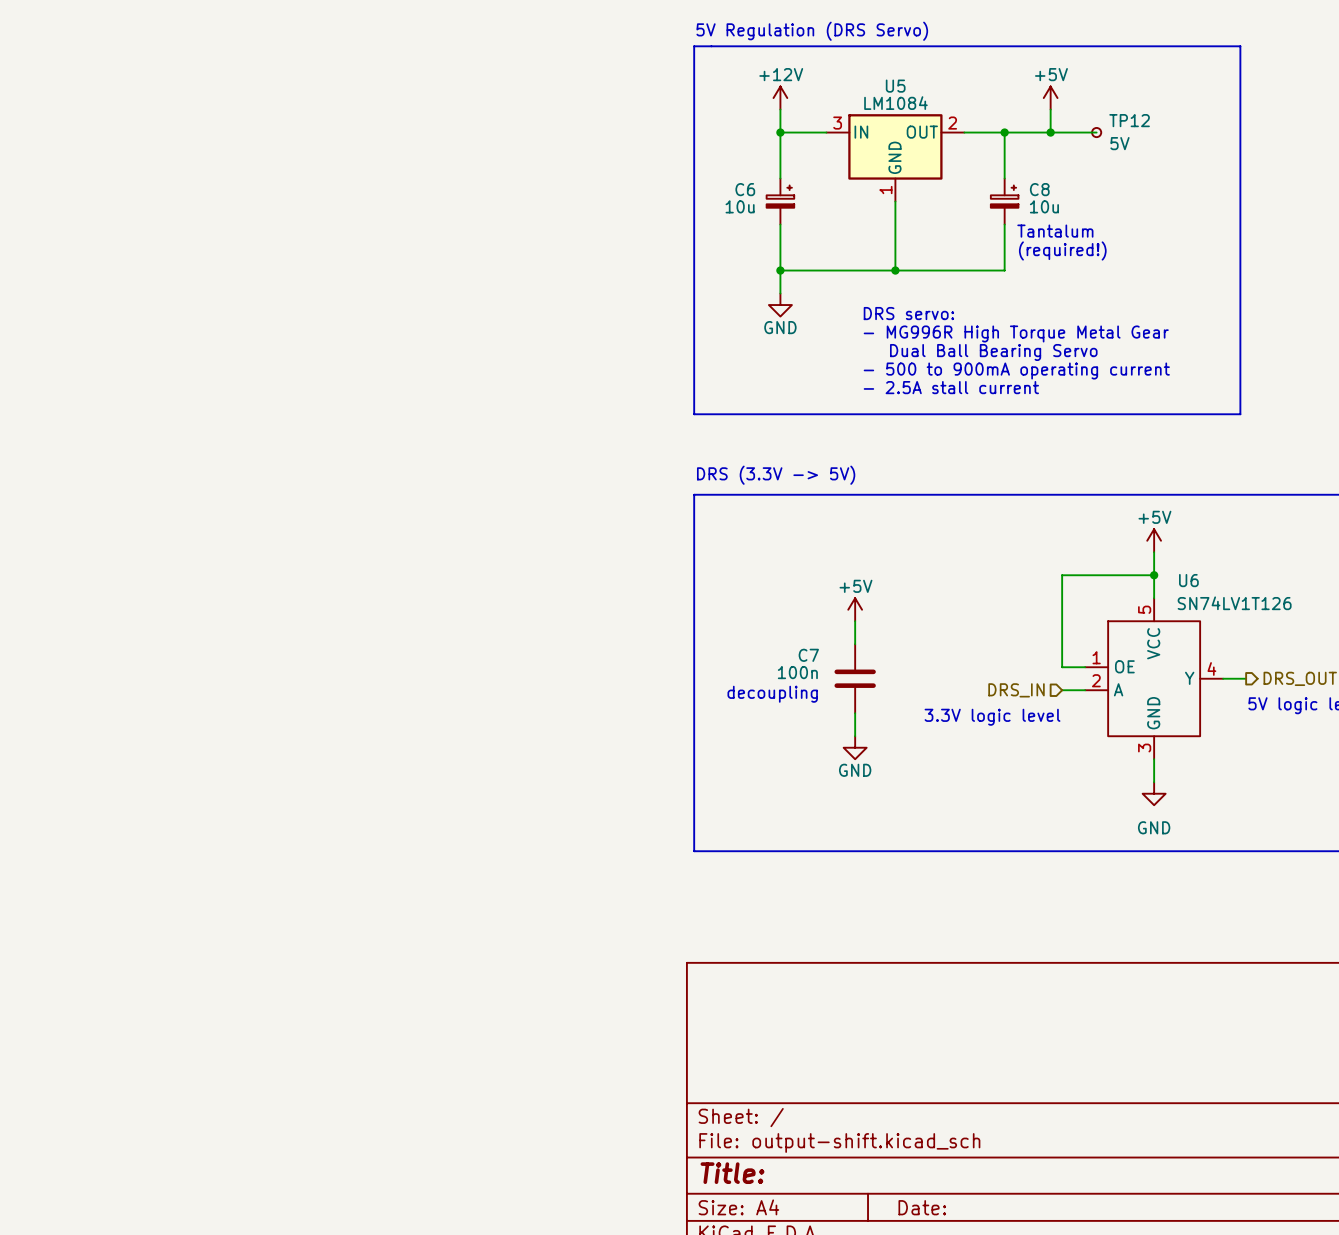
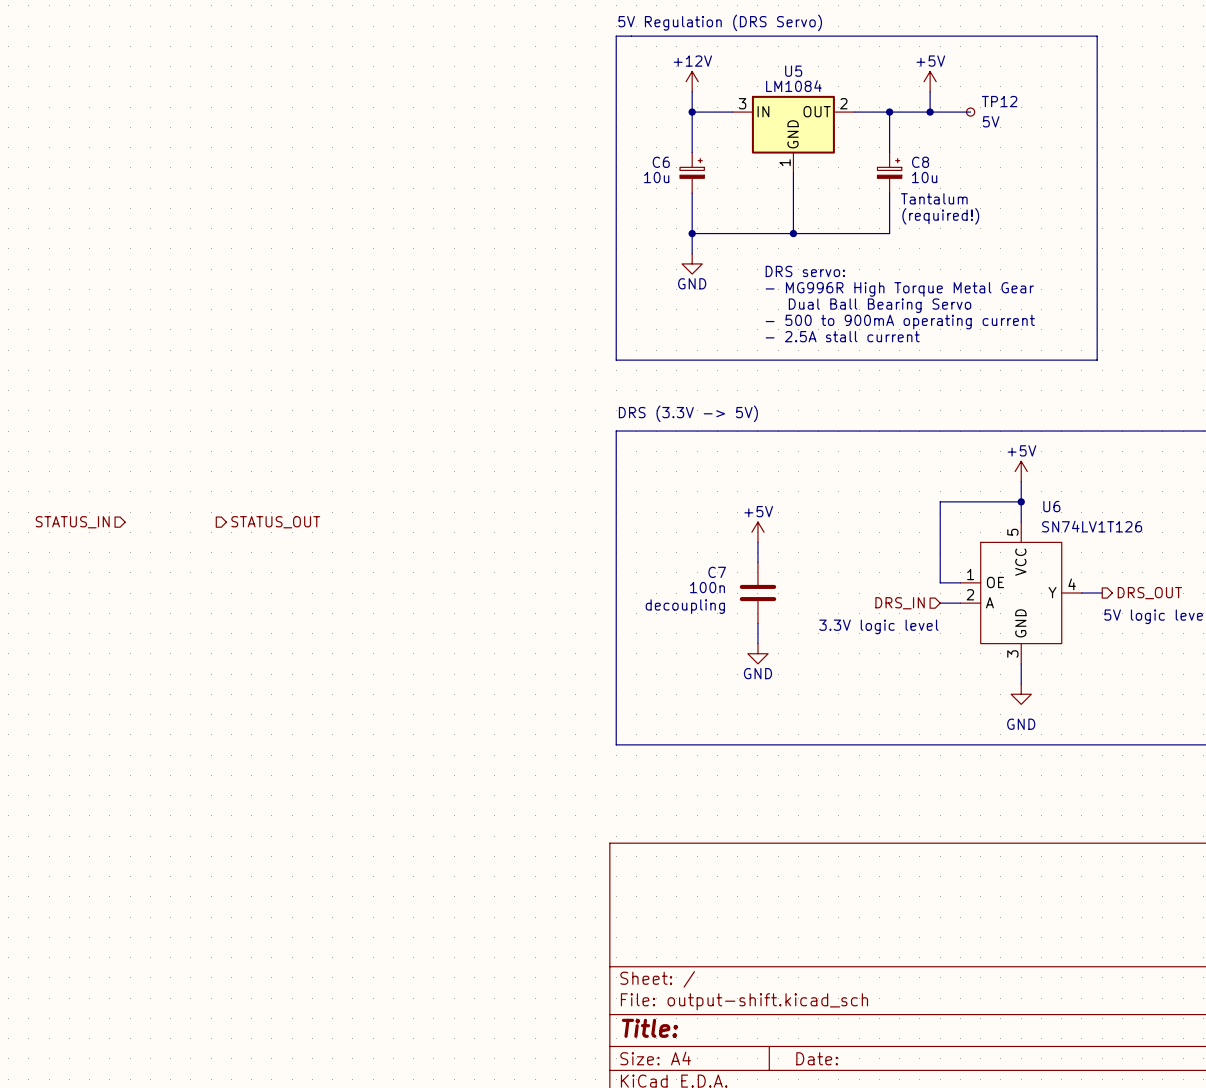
hierarchical label: none -> STATUS_IN (72, 522)
hierarchical label: none -> STATUS_OUT (275, 522)

